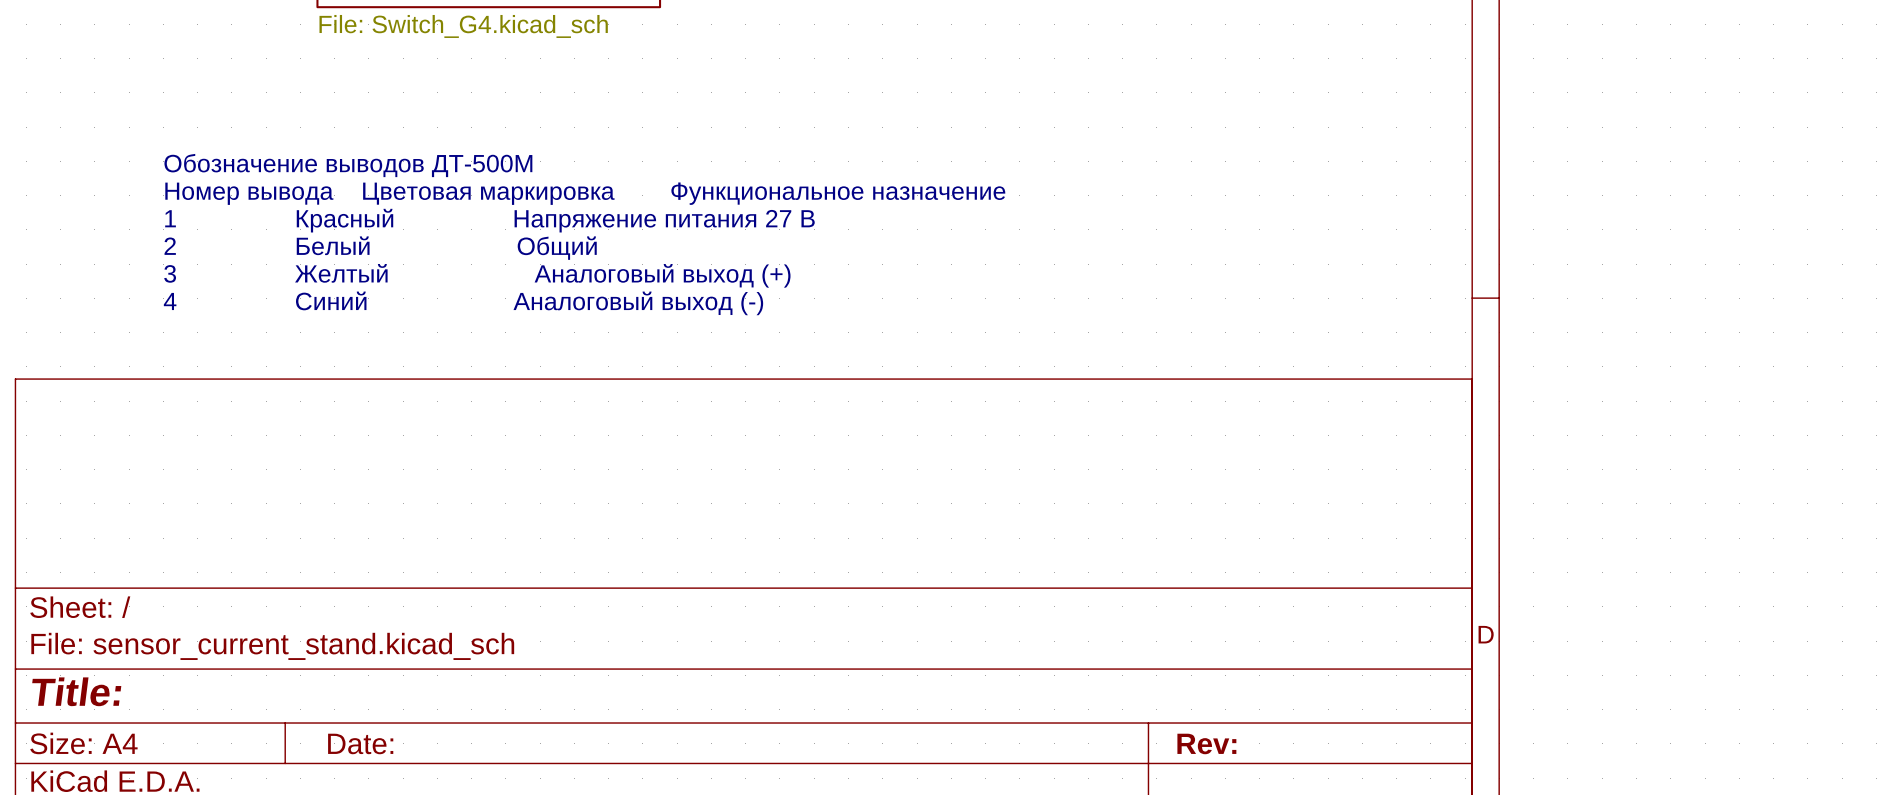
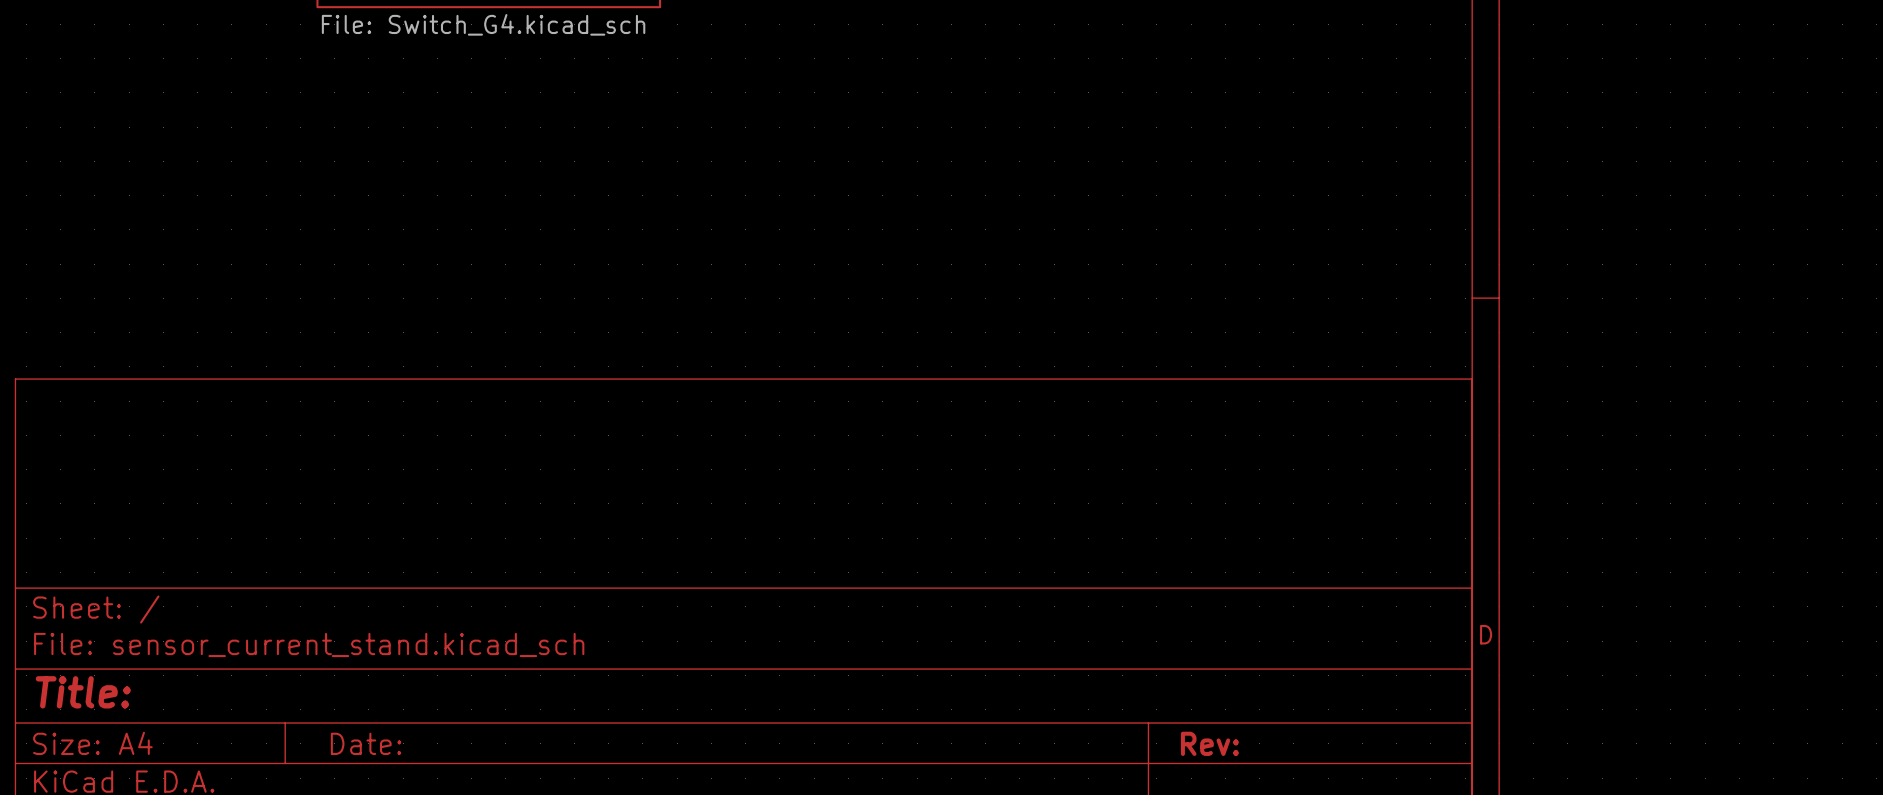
text: Обозначение выводов ДТ-500М (348, 165) -> none
text: Номер вывода Цветовая маркировка Функциональное назначение (585, 193) -> none
text: 1 Красный Напряжение питания 27 В (489, 220) -> none
text: 2 Белый Общий (380, 248) -> none
text: 3 Желтый Аналоговый выход (+) (477, 275) -> none
text: 4 Синий Аналоговый выход (-) (463, 303) -> none

